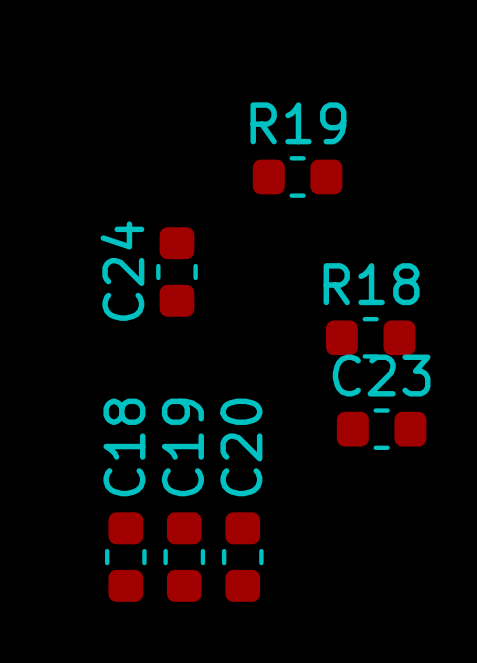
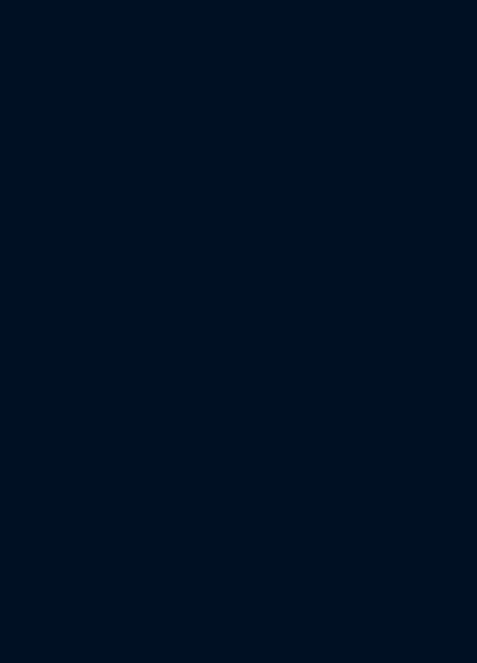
R19: (297, 176) -> none
C24: (176, 272) -> none
R18: (370, 337) -> none
C23: (381, 429) -> none
C18: (125, 557) -> none
C19: (184, 557) -> none
C20: (242, 557) -> none

